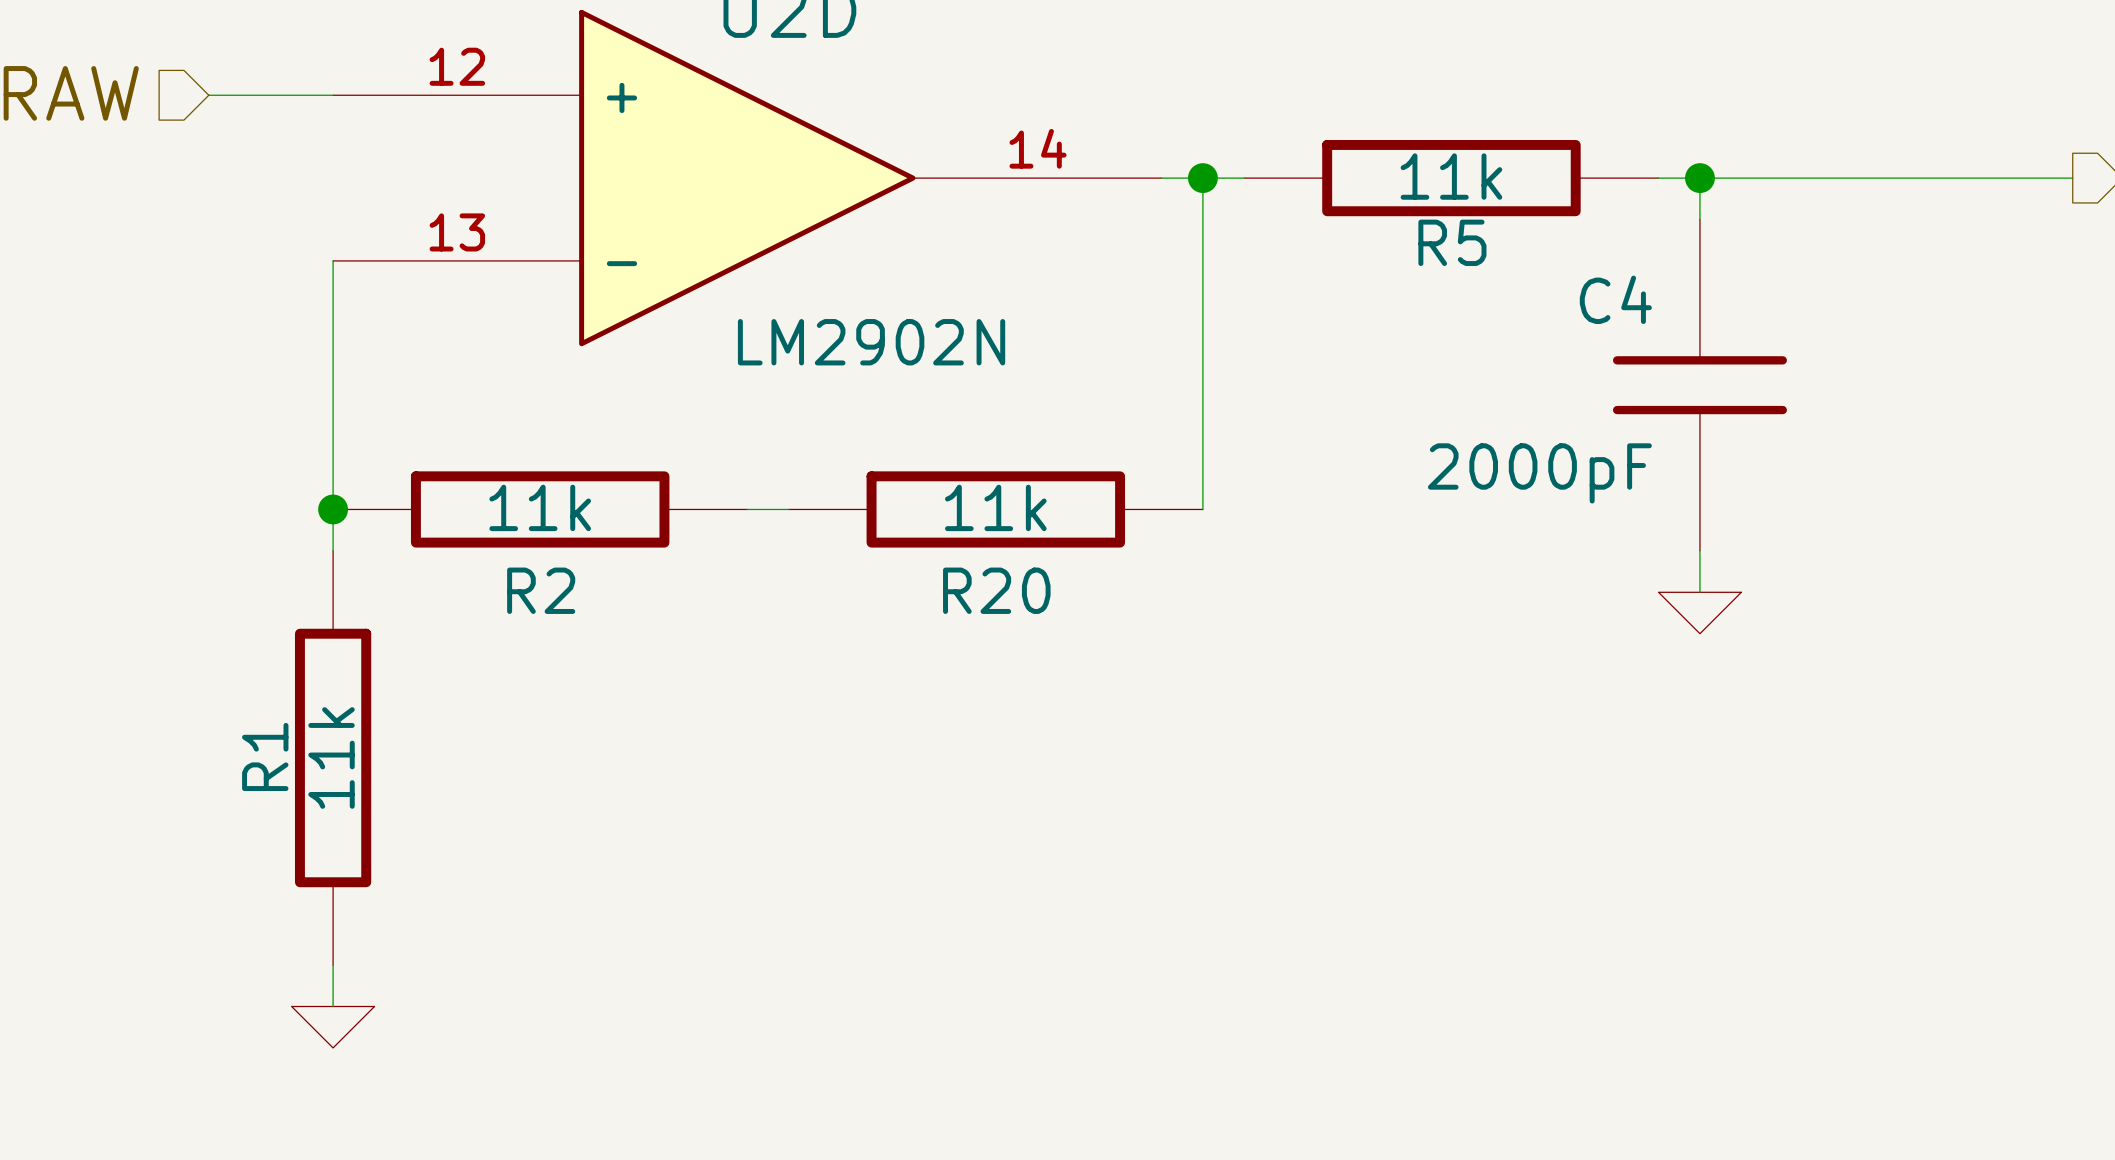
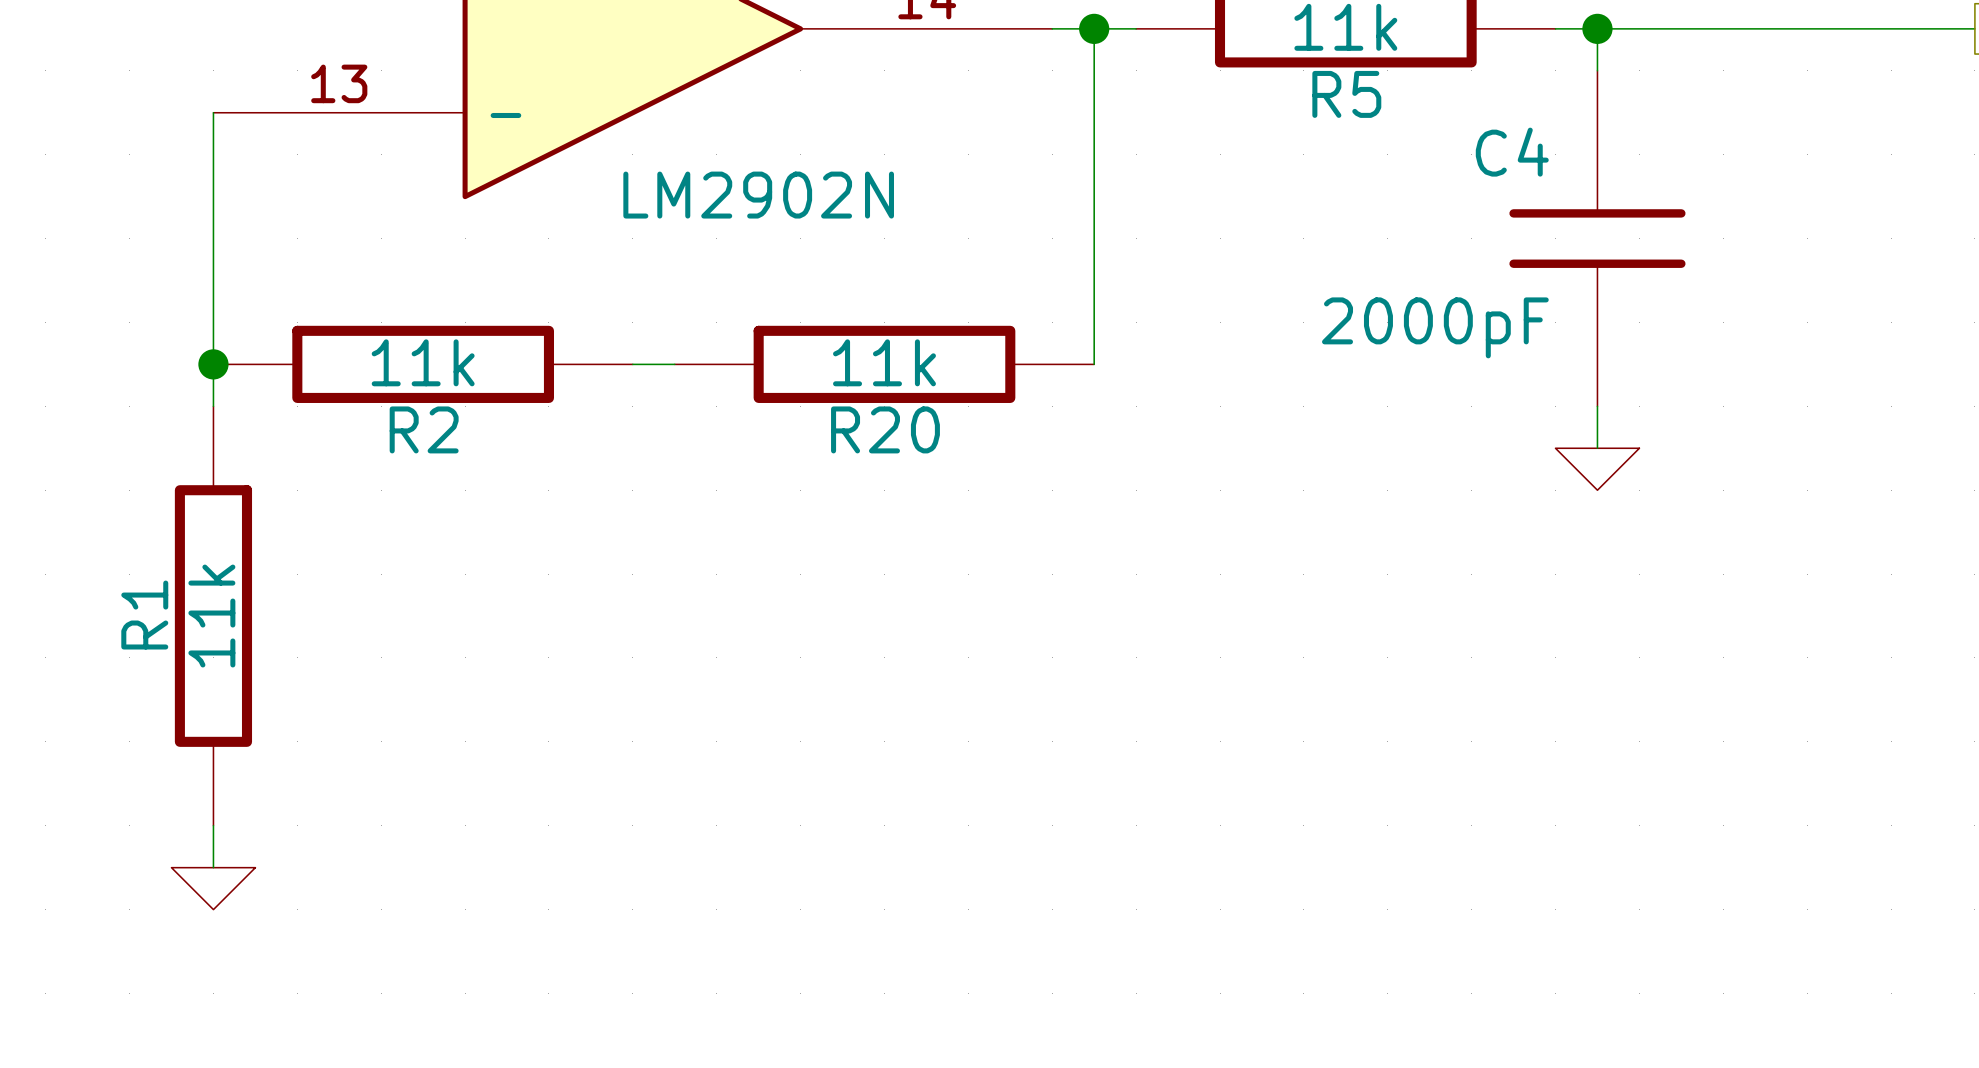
R2 name position: R2 (541, 590) -> R2 (424, 429)
R20 name position: R20 (996, 590) -> R20 (885, 429)

